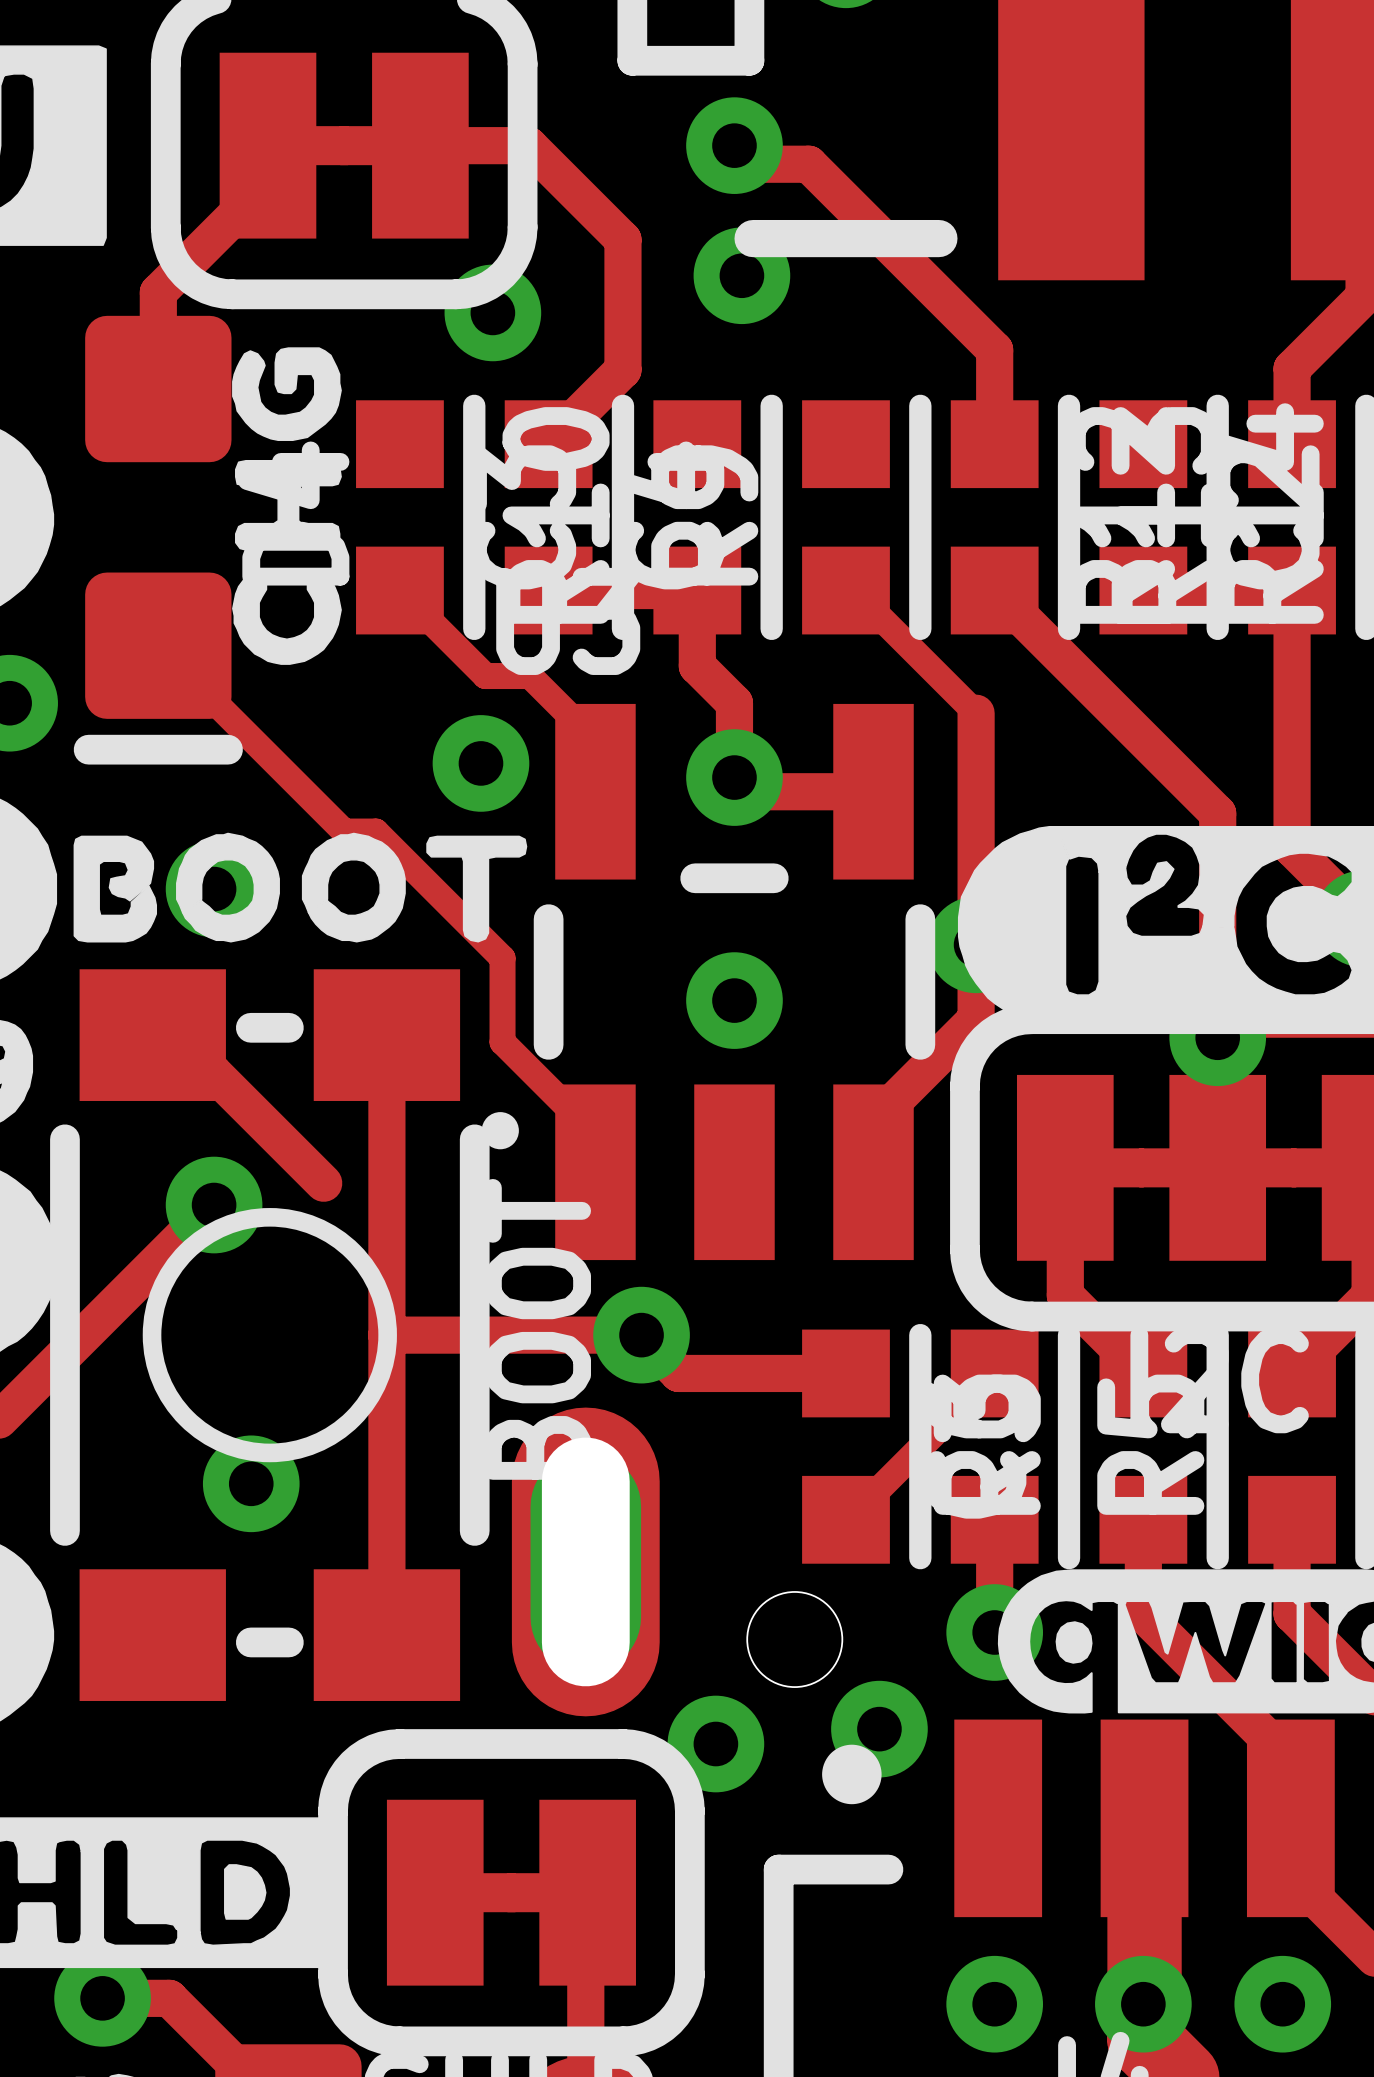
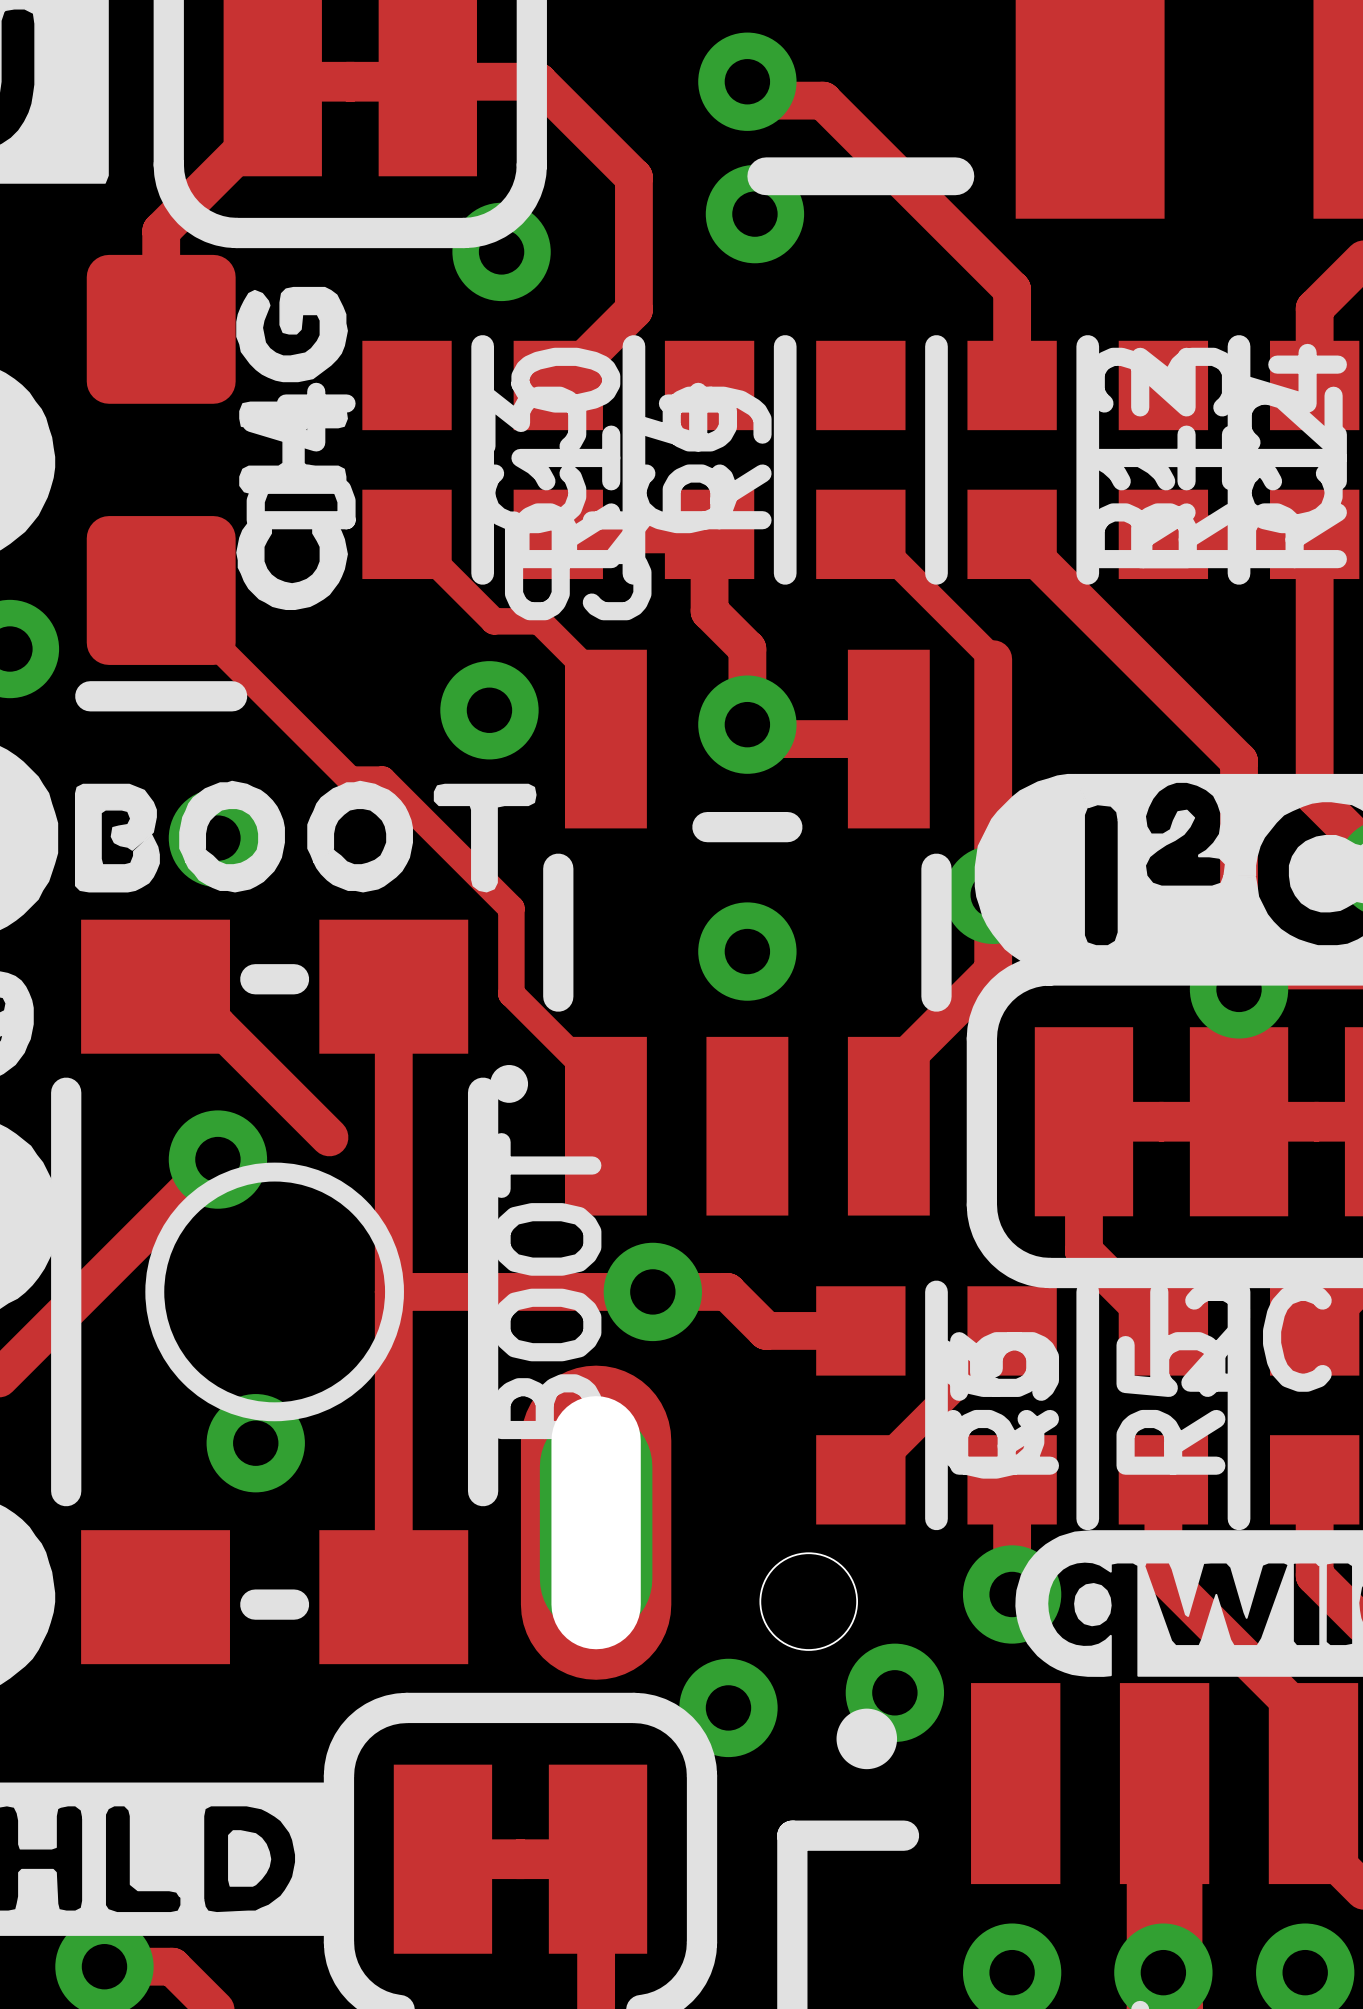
track: (641, 1336) (678, 1373) (753, 1373) -> (652, 1291) (727, 1291) (766, 1330)

